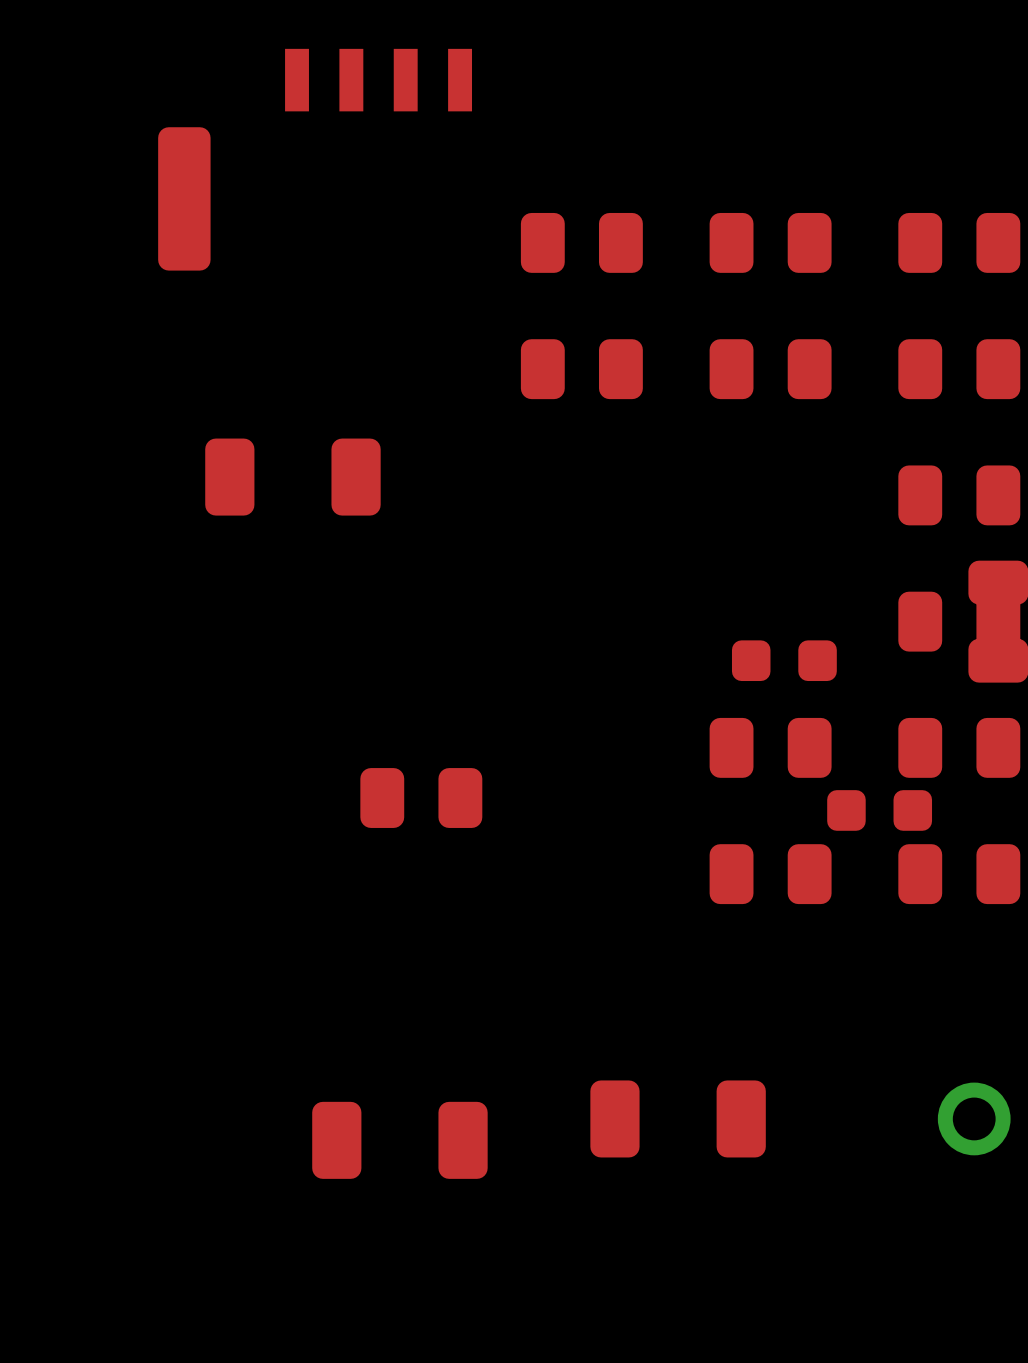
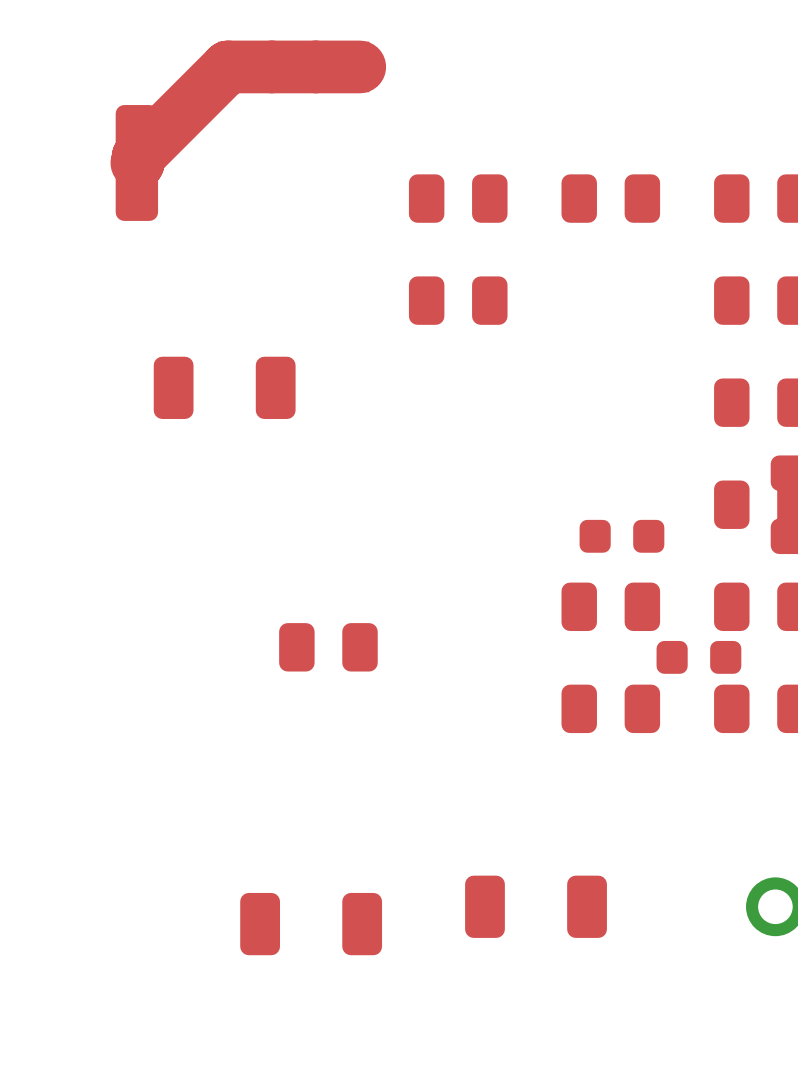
top track: none -> (359, 66) (227, 66) (138, 156) (136, 162)
part: (770, 369) -> none

